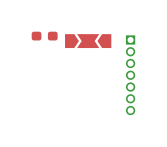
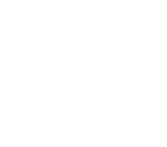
part: (44, 36) -> none
part: (88, 41) -> none
part: (130, 75) -> none

